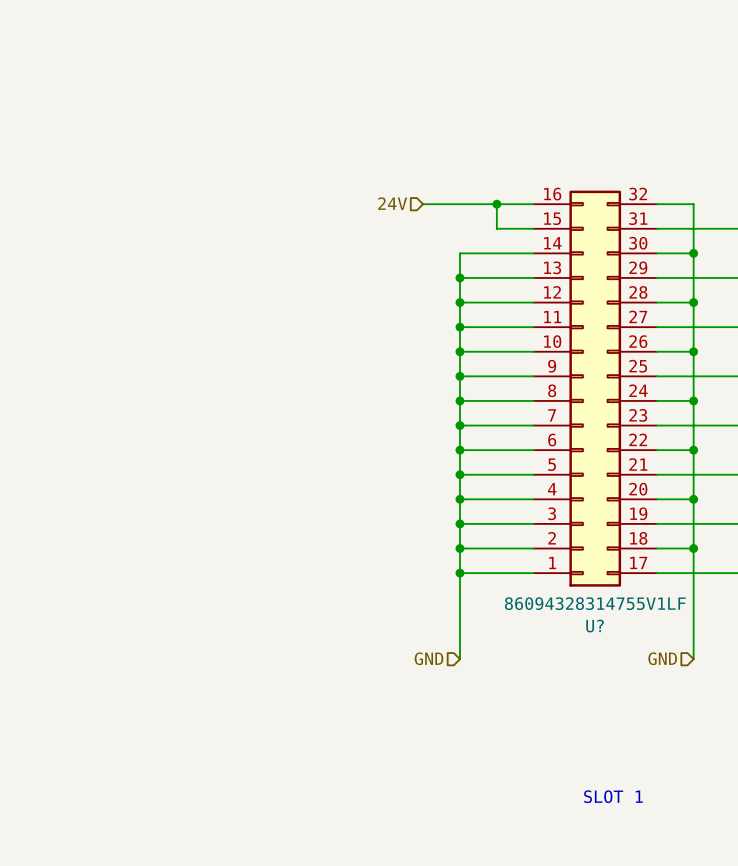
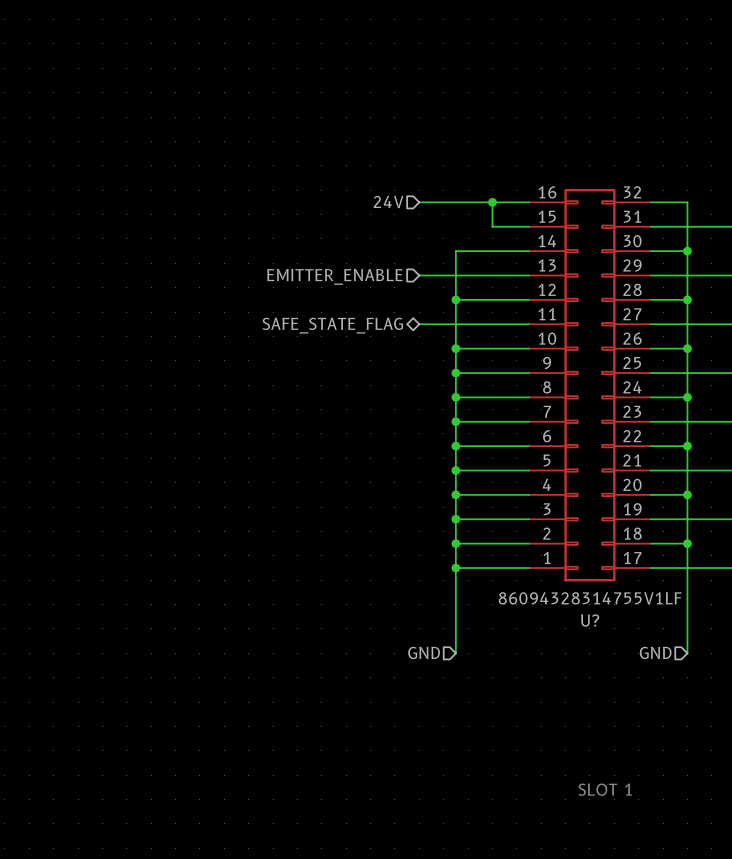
wire: none -> (419, 275) (455, 275)
junction: (459, 277) -> none
hierarchical label: none -> EMITTER_ENABLE (334, 276)
wire: none -> (419, 324) (455, 324)
junction: (459, 327) -> none
hierarchical label: none -> SAFE_STATE_FLAG (332, 325)

